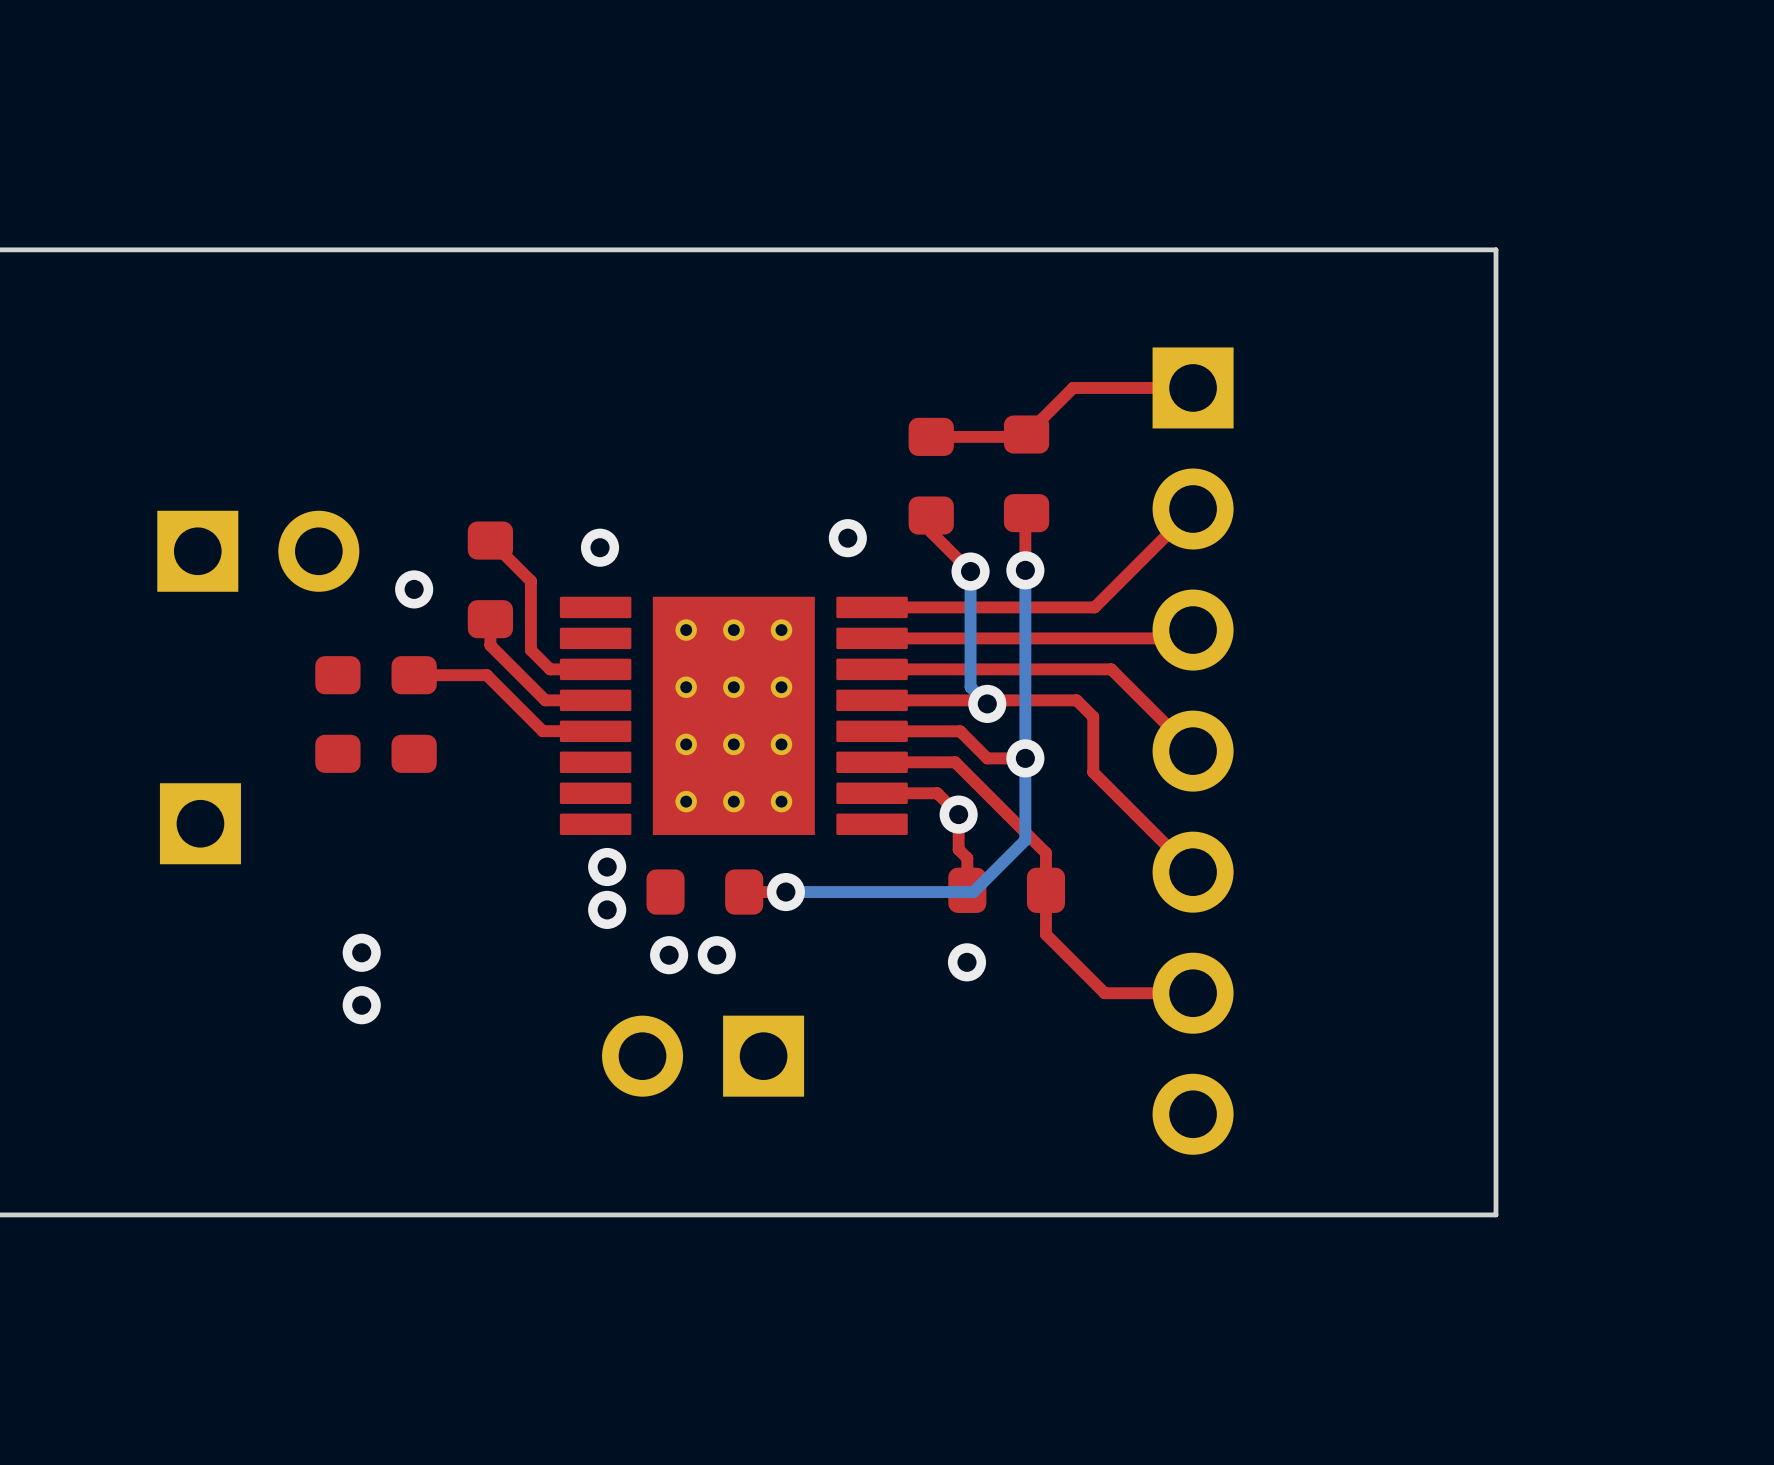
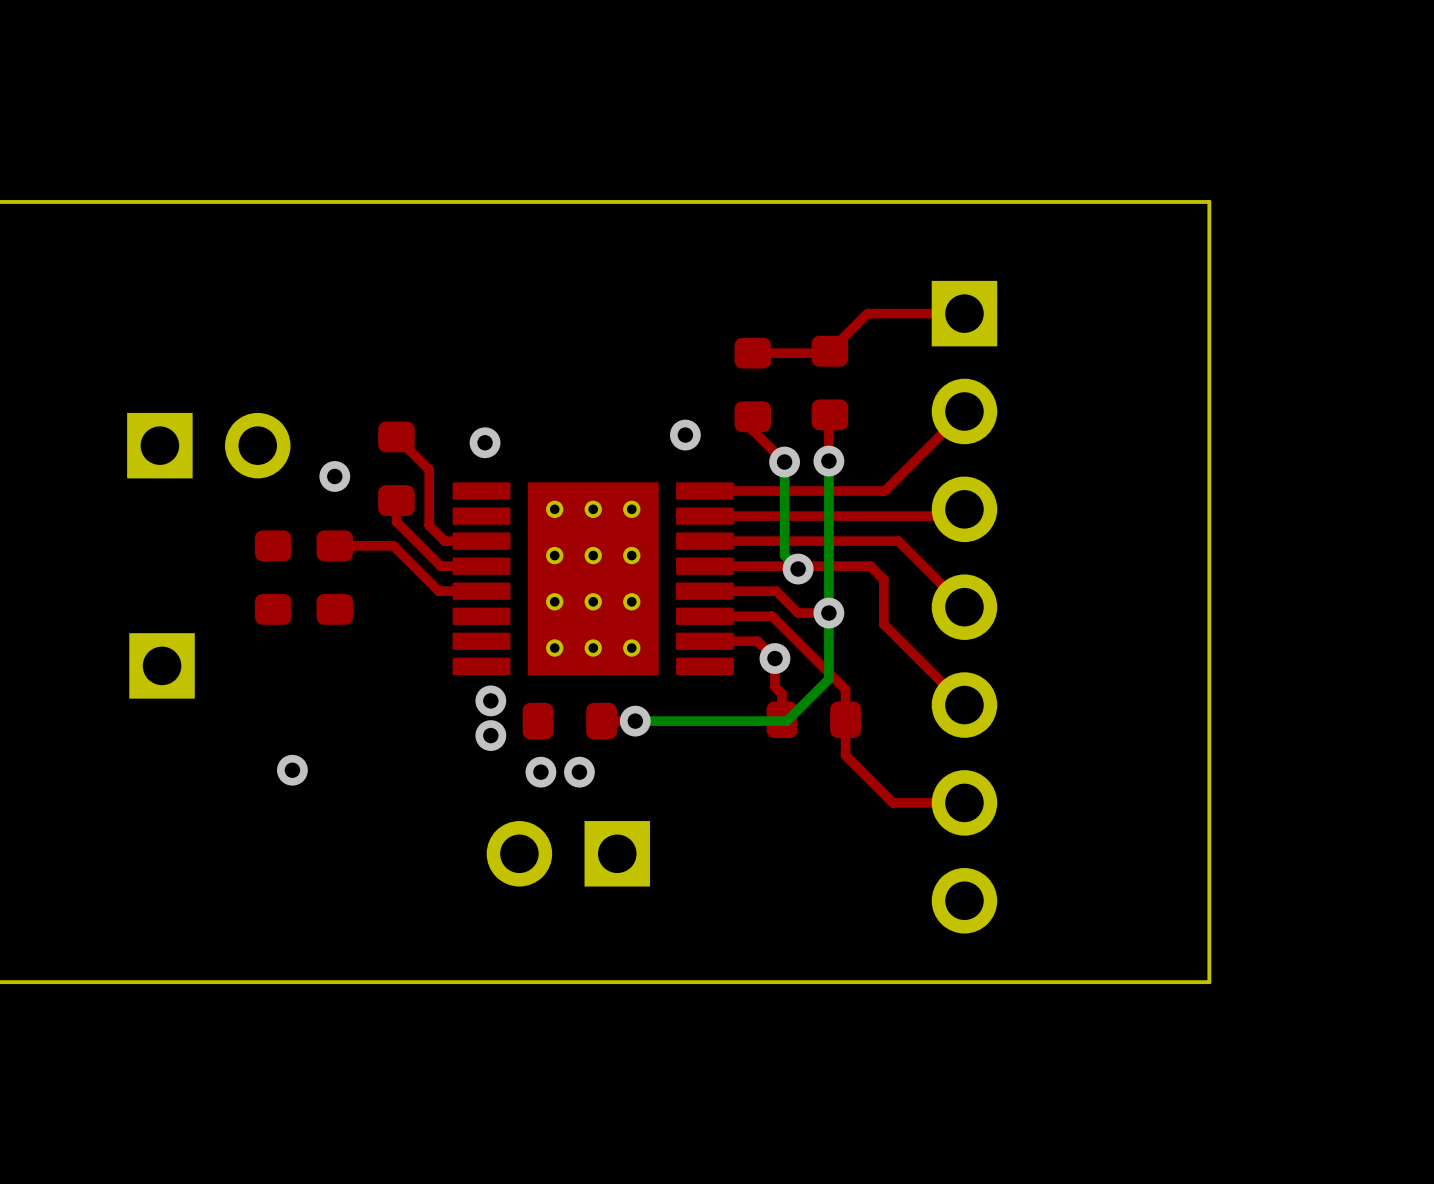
via: (966, 962) -> none
via: (361, 1005) -> none

